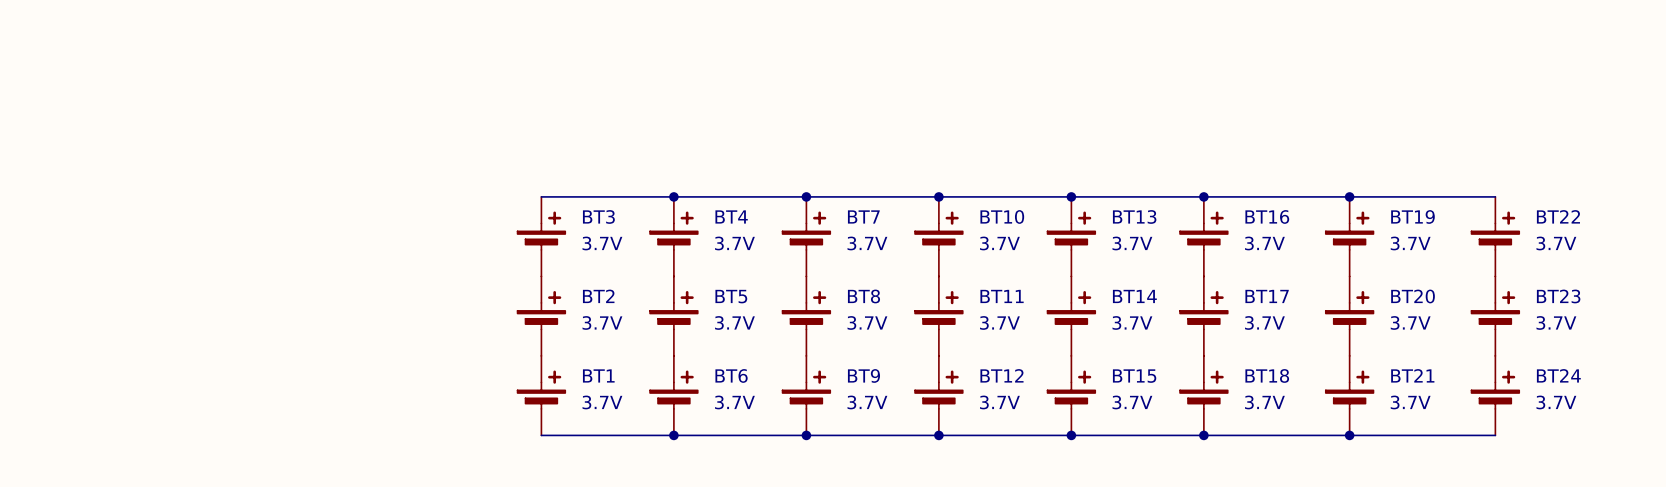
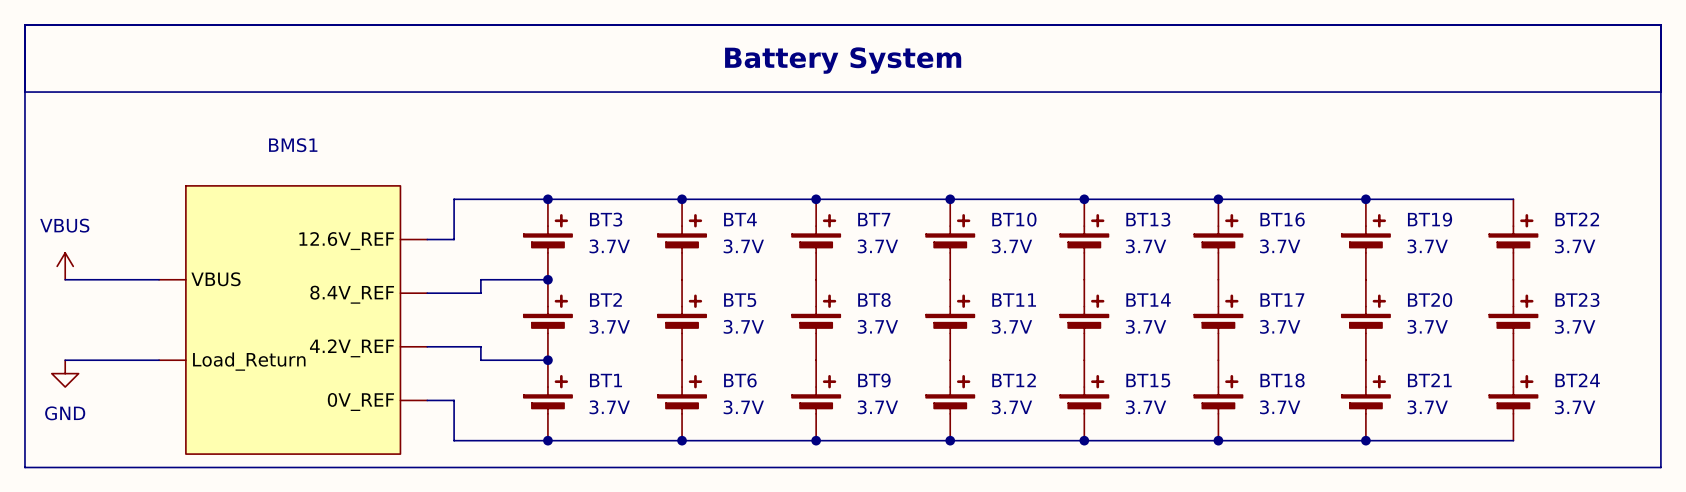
line: none -> (24, 24) (1660, 24) (1660, 467) (24, 467) (24, 24)
text: none -> Battery System (843, 60)
line: none -> (24, 92) (1660, 92)
wire: none -> (547, 199) (454, 199) (454, 239) (427, 239)
junction: none -> (547, 199)
power symbol: none -> VBUS (65, 266)
wire: none -> (65, 279) (159, 279)
wire: none -> (547, 279) (480, 279) (480, 293) (427, 293)
junction: none -> (547, 279)
BMS1: none -> (293, 319)
wire: none -> (427, 346) (480, 346) (480, 360) (547, 360)
wire: none -> (65, 360) (159, 360)
junction: none -> (547, 360)
power symbol: none -> GND (65, 373)
wire: none -> (427, 400) (454, 400) (454, 440) (547, 440)
junction: none -> (547, 440)

